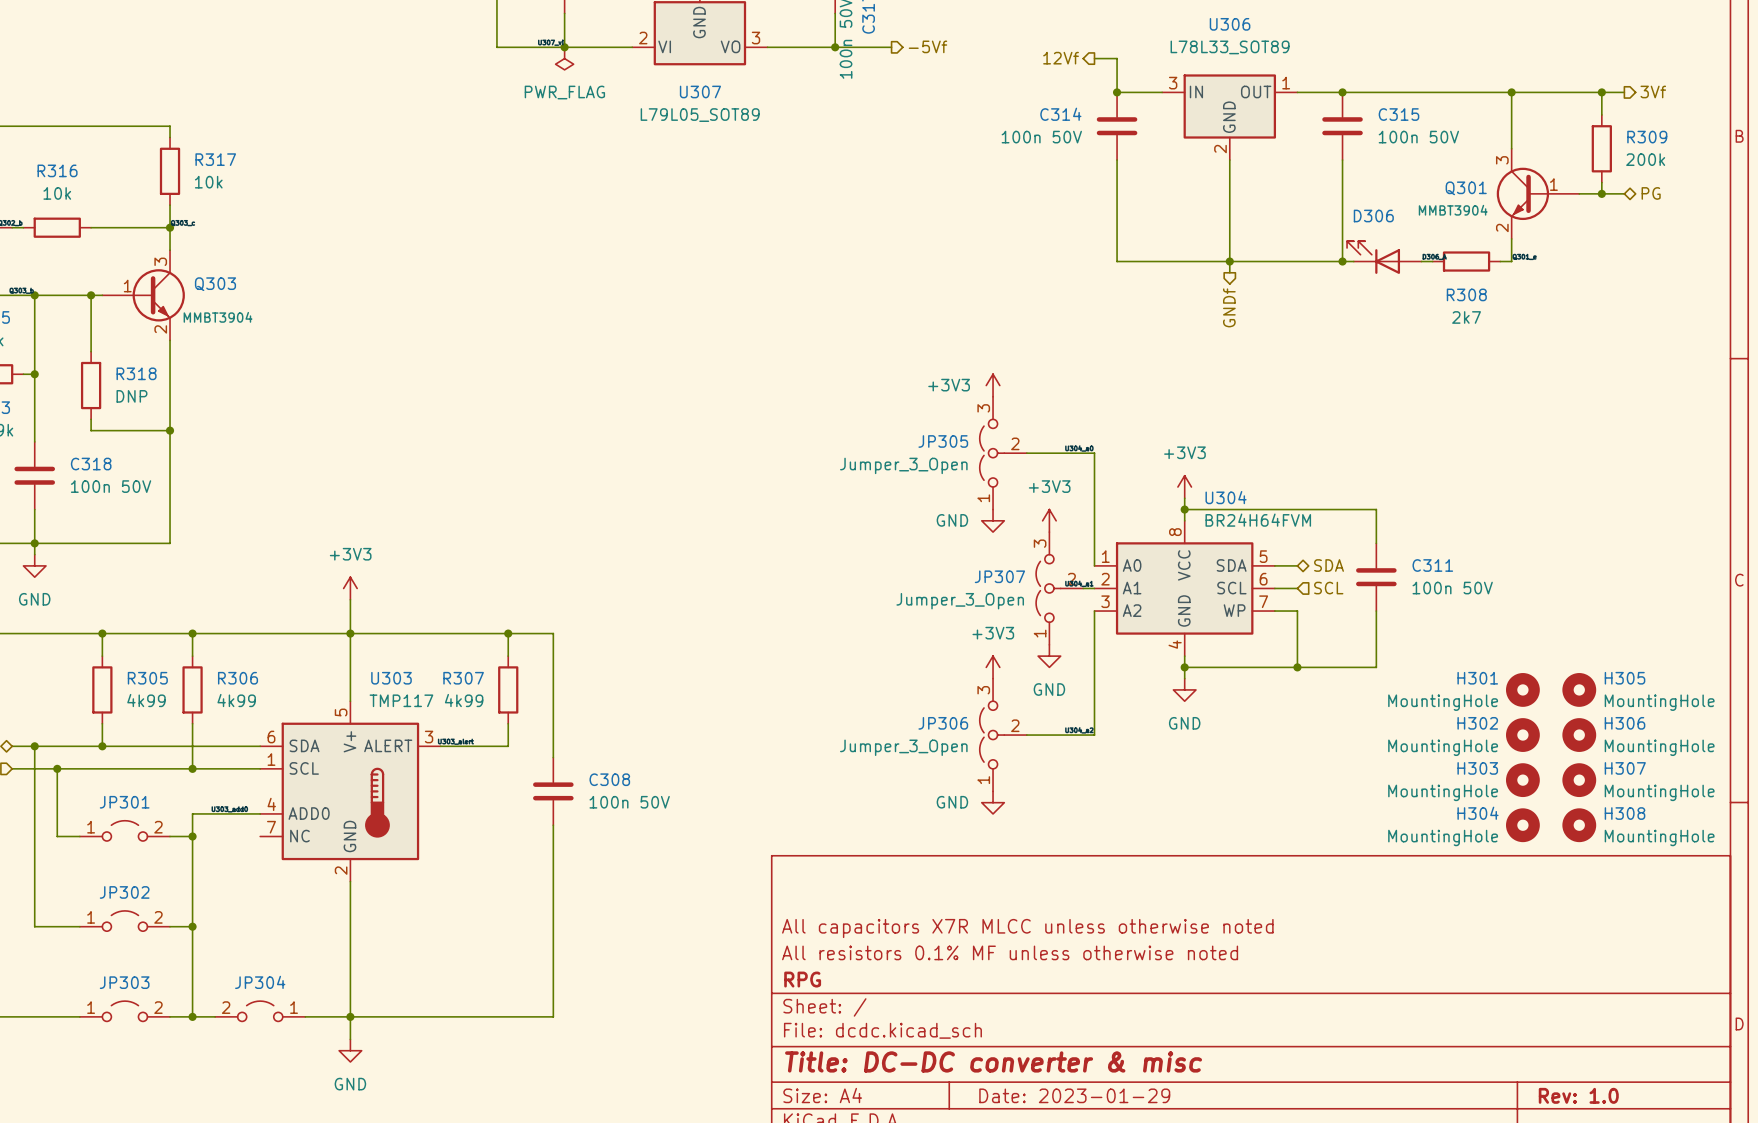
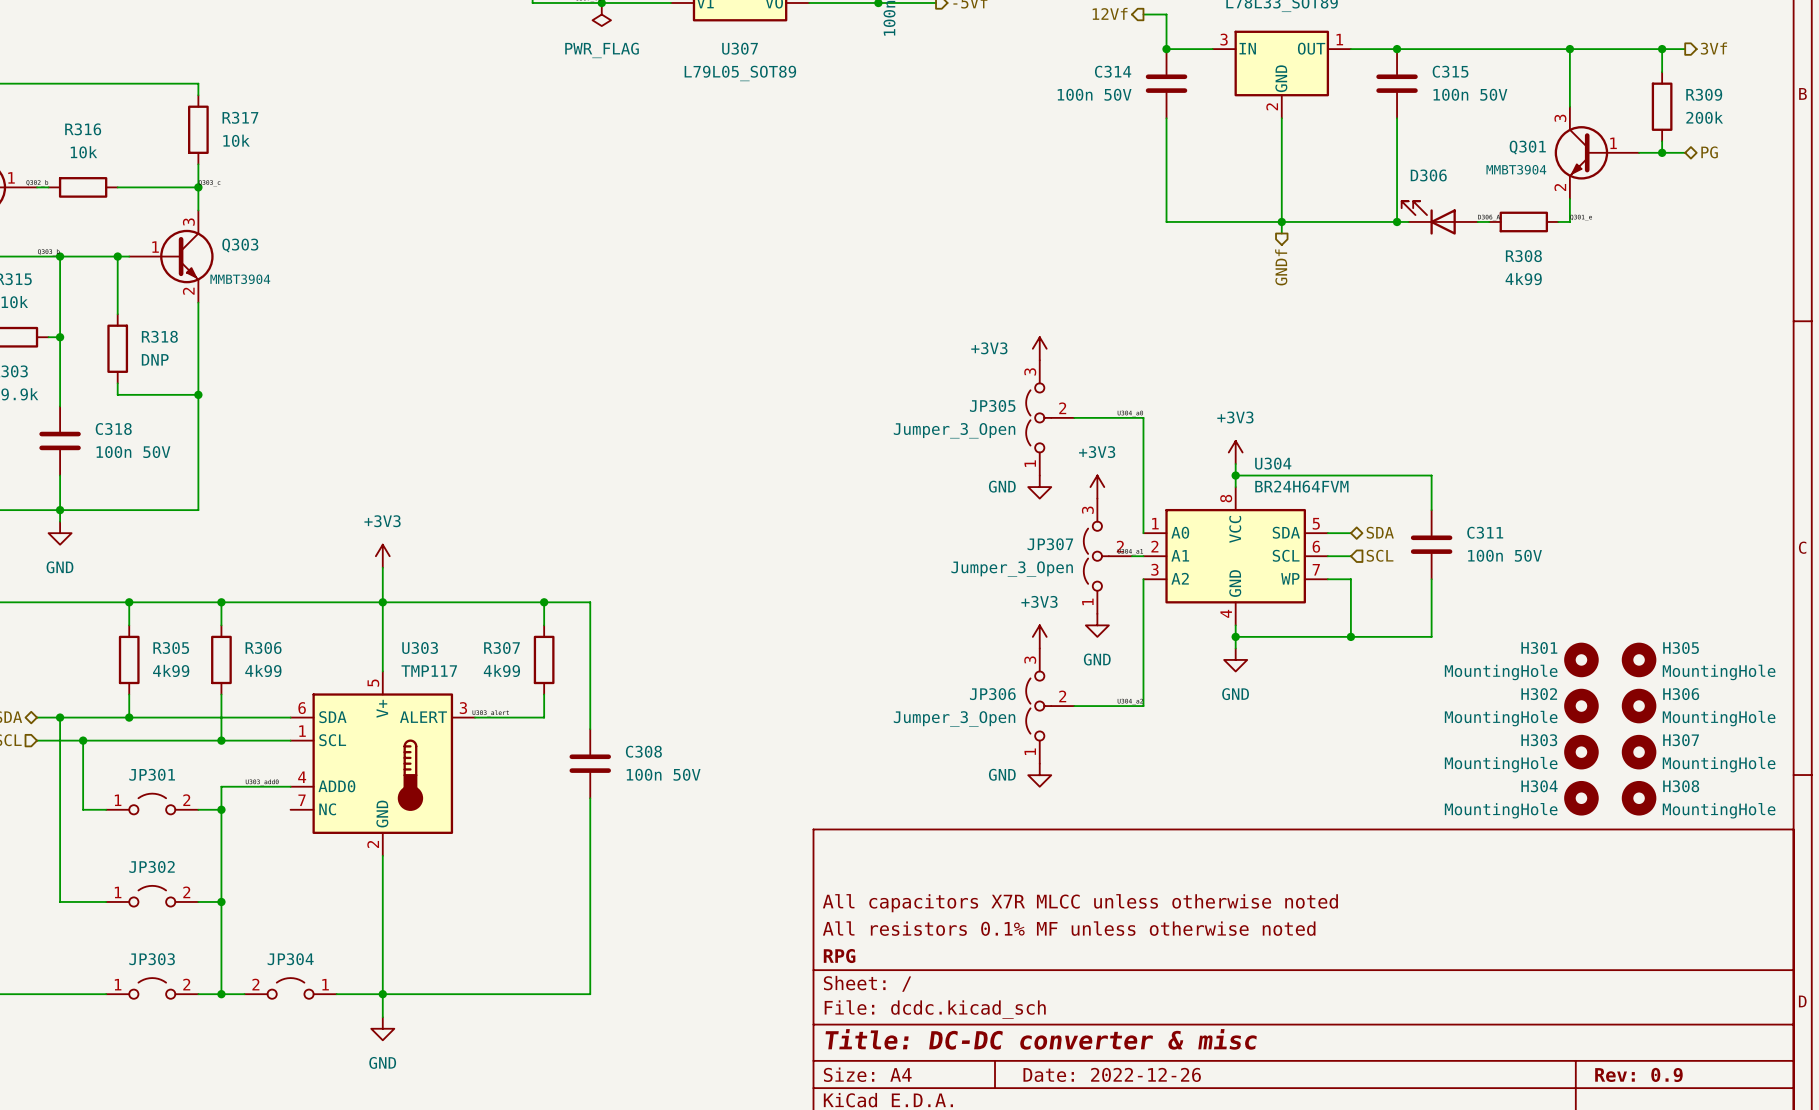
R308 value: 2k7 (1466, 317) -> 4k99 (1523, 279)
title block: Date: 2023-01-29 (1074, 1095) -> Date: 2022-12-26 (1112, 1074)
title block: Rev: 1.0 (1578, 1095) -> Rev: 0.9 (1638, 1074)

